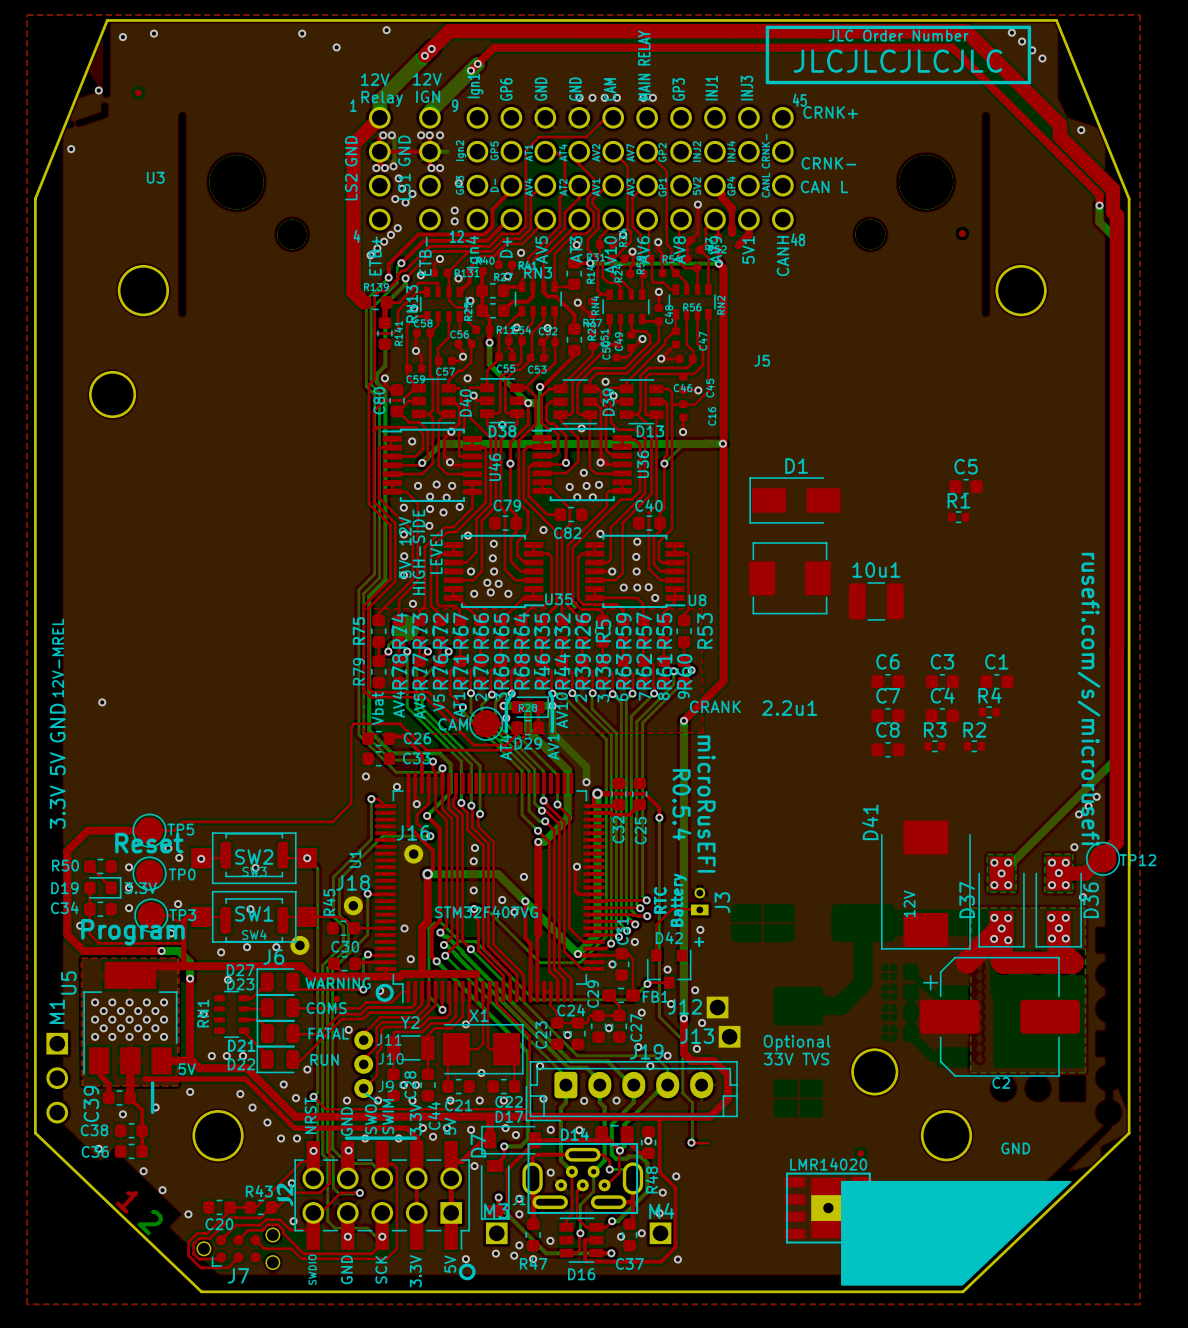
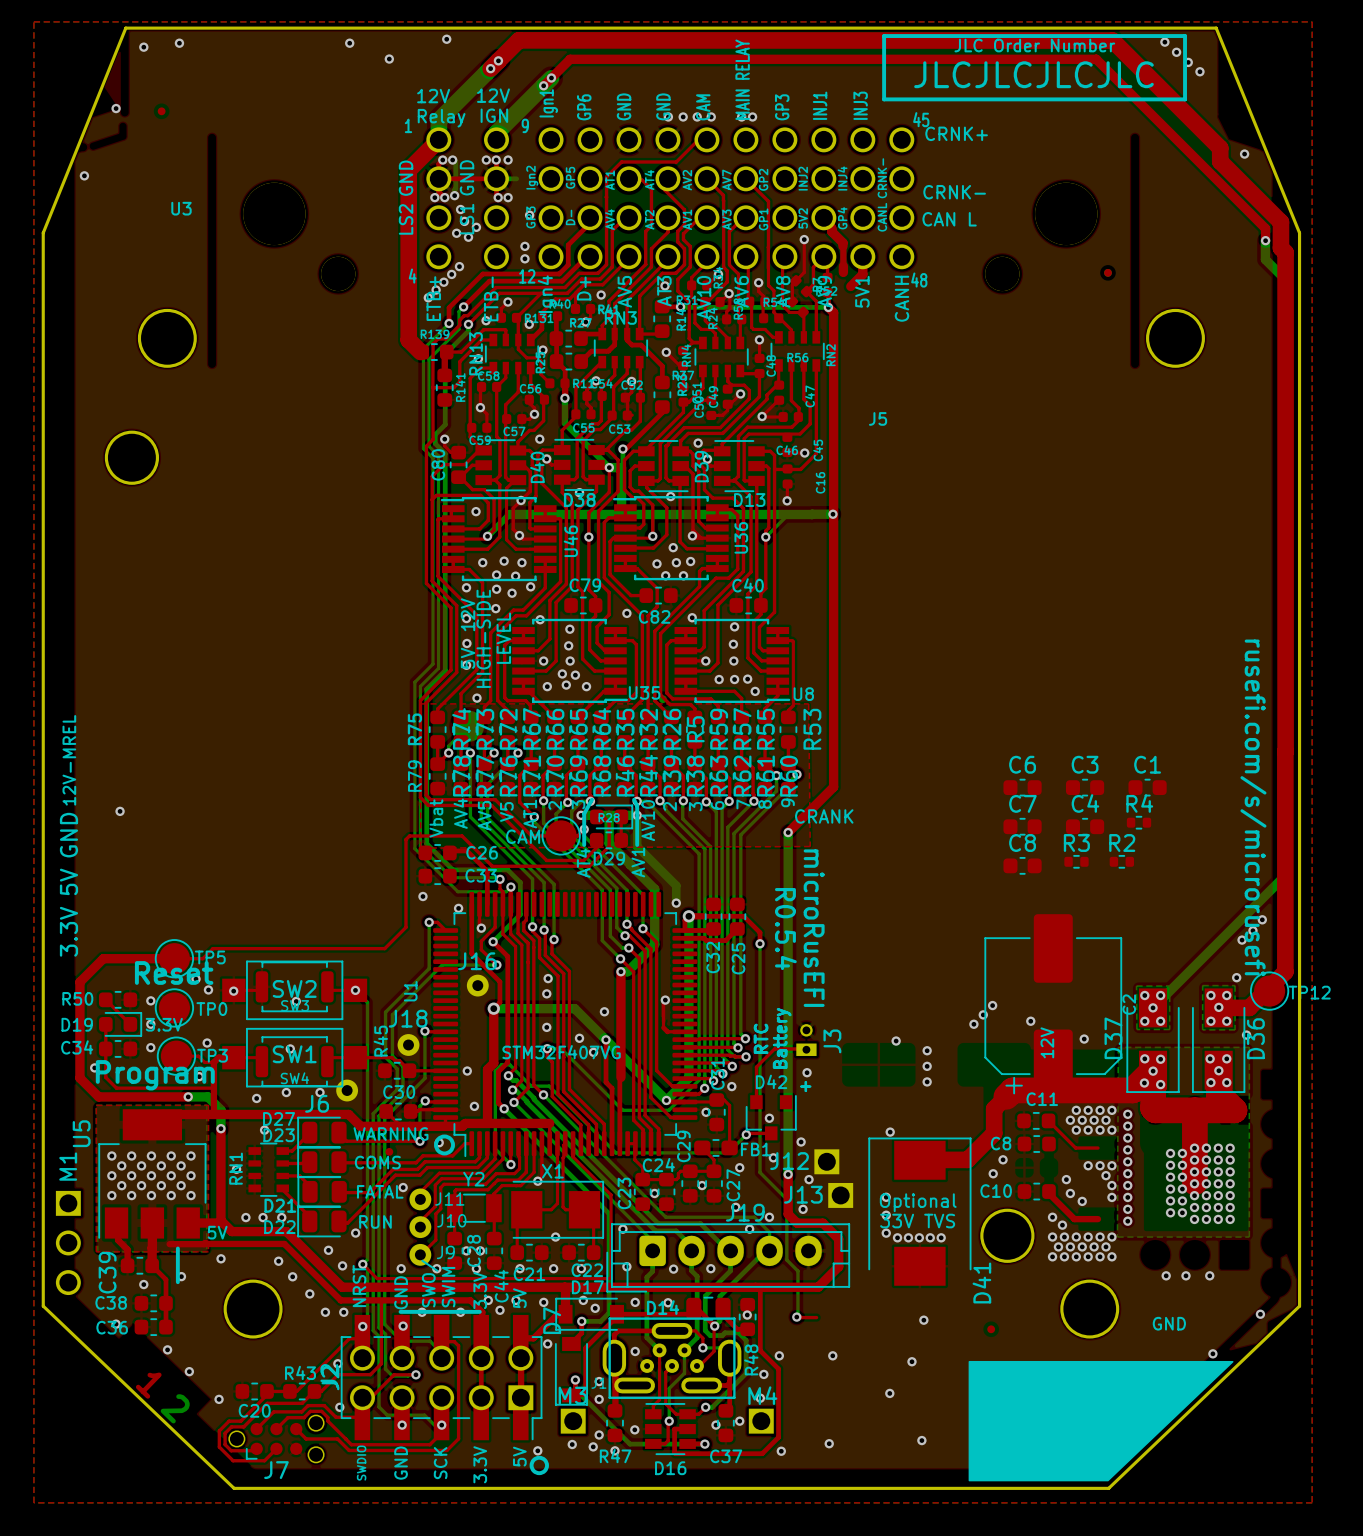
C5: (966, 486) -> none
D1: (794, 500) -> none
R1: (958, 517) -> none
2.2u1: (789, 578) -> none
10u1: (876, 601) -> none
via: none -> (992, 1005)
via: none -> (983, 1014)
via: none -> (1030, 1021)
D41 rotation: 0° (925, 885) -> 180° (919, 1211)
D41 position: (925, 885) -> (919, 1211)
via: none -> (973, 1024)
via: none -> (1084, 1039)
via: none -> (896, 1041)
via: none -> (927, 1050)
via: none -> (927, 1066)
via: none -> (927, 1081)
top track: (984, 945) (966, 962) -> (1132, 1090) (1012, 1090) (994, 1108) (994, 1133) (967, 1159) (919, 1160)
via: none -> (1076, 1110)
via: none -> (1088, 1110)
via: none -> (1100, 1110)
via: none -> (1111, 1110)
top track: none -> (1194, 1110) (1194, 1182)
via: none -> (1127, 1114)
C11: none -> (1036, 1120)
top track: none -> (1048, 1120) (1075, 1148) (1097, 1148)
via: none -> (1070, 1120)
via: none -> (1082, 1120)
via: none -> (1094, 1120)
via: none -> (1106, 1120)
via: none -> (1127, 1126)
via: none -> (1076, 1130)
via: none -> (1088, 1130)
via: none -> (1100, 1130)
via: none -> (1111, 1130)
via: none -> (890, 1132)
via: none -> (1127, 1138)
C8: none -> (1036, 1144)
via: none -> (1194, 1148)
via: none -> (1206, 1148)
via: none -> (1218, 1148)
via: none -> (1230, 1148)
via: none -> (1127, 1149)
via: none -> (1170, 1153)
via: none -> (1182, 1153)
via: none -> (1003, 1159)
via: none -> (1194, 1160)
via: none -> (1206, 1160)
via: none -> (1218, 1160)
via: none -> (1230, 1160)
via: none -> (1127, 1161)
via: none -> (1088, 1165)
via: none -> (1100, 1165)
via: none -> (1111, 1165)
via: none -> (1170, 1165)
via: none -> (1182, 1165)
C2 rotation: 0° (999, 1016) -> 90° counterclockwise (1053, 1006)
C2 position: (999, 1016) -> (1053, 1006)
via: none -> (1194, 1171)
via: none -> (1206, 1171)
via: none -> (1218, 1171)
via: none -> (1230, 1171)
via: none -> (993, 1173)
via: none -> (1127, 1173)
via: none -> (1106, 1175)
via: none -> (1170, 1177)
via: none -> (1182, 1177)
via: none -> (1066, 1179)
via: none -> (1194, 1183)
via: none -> (1206, 1183)
via: none -> (1218, 1183)
via: none -> (1230, 1183)
via: none -> (1111, 1185)
via: none -> (1127, 1185)
via: none -> (1170, 1189)
via: none -> (1182, 1189)
C10: none -> (1036, 1191)
top track: none -> (1049, 1191) (1074, 1219) (1097, 1219)
via: none -> (1070, 1193)
via: none -> (1194, 1195)
via: none -> (1206, 1195)
via: none -> (1218, 1195)
via: none -> (1230, 1195)
via: none -> (886, 1197)
via: none -> (1111, 1197)
via: none -> (1127, 1197)
via: none -> (1082, 1201)
via: none -> (1170, 1200)
via: none -> (1182, 1200)
via: none -> (1194, 1207)
via: none -> (1206, 1207)
via: none -> (1218, 1207)
via: none -> (1230, 1207)
via: none -> (1127, 1209)
via: none -> (1170, 1212)
via: none -> (1182, 1212)
via: none -> (886, 1215)
via: none -> (1052, 1217)
via: none -> (1194, 1219)
via: none -> (1206, 1219)
via: none -> (1218, 1219)
via: none -> (1230, 1219)
via: none -> (1127, 1221)
via: none -> (1062, 1225)
via: none -> (886, 1233)
via: none -> (1052, 1237)
via: none -> (1064, 1237)
via: none -> (1076, 1237)
via: none -> (1088, 1237)
via: none -> (1100, 1237)
via: none -> (1111, 1237)
via: none -> (897, 1237)
via: none -> (908, 1237)
via: none -> (919, 1237)
via: none -> (930, 1237)
via: none -> (941, 1237)
via: none -> (1058, 1246)
via: none -> (1070, 1246)
via: none -> (1082, 1246)
via: none -> (1094, 1246)
via: none -> (1106, 1246)
via: none -> (1052, 1256)
via: none -> (1064, 1256)
via: none -> (1076, 1256)
via: none -> (1088, 1256)
via: none -> (1100, 1256)
via: none -> (1111, 1256)
via: none -> (1166, 1275)
via: none -> (1185, 1275)
via: none -> (1209, 1275)
via: none -> (1260, 1314)
via: none -> (923, 1320)
via: none -> (1212, 1353)
via: none -> (832, 1355)
via: none -> (911, 1361)
via: none -> (889, 1393)
part: LMR14020 (829, 1209) -> none
via: none -> (921, 1440)
via: none -> (829, 1443)

